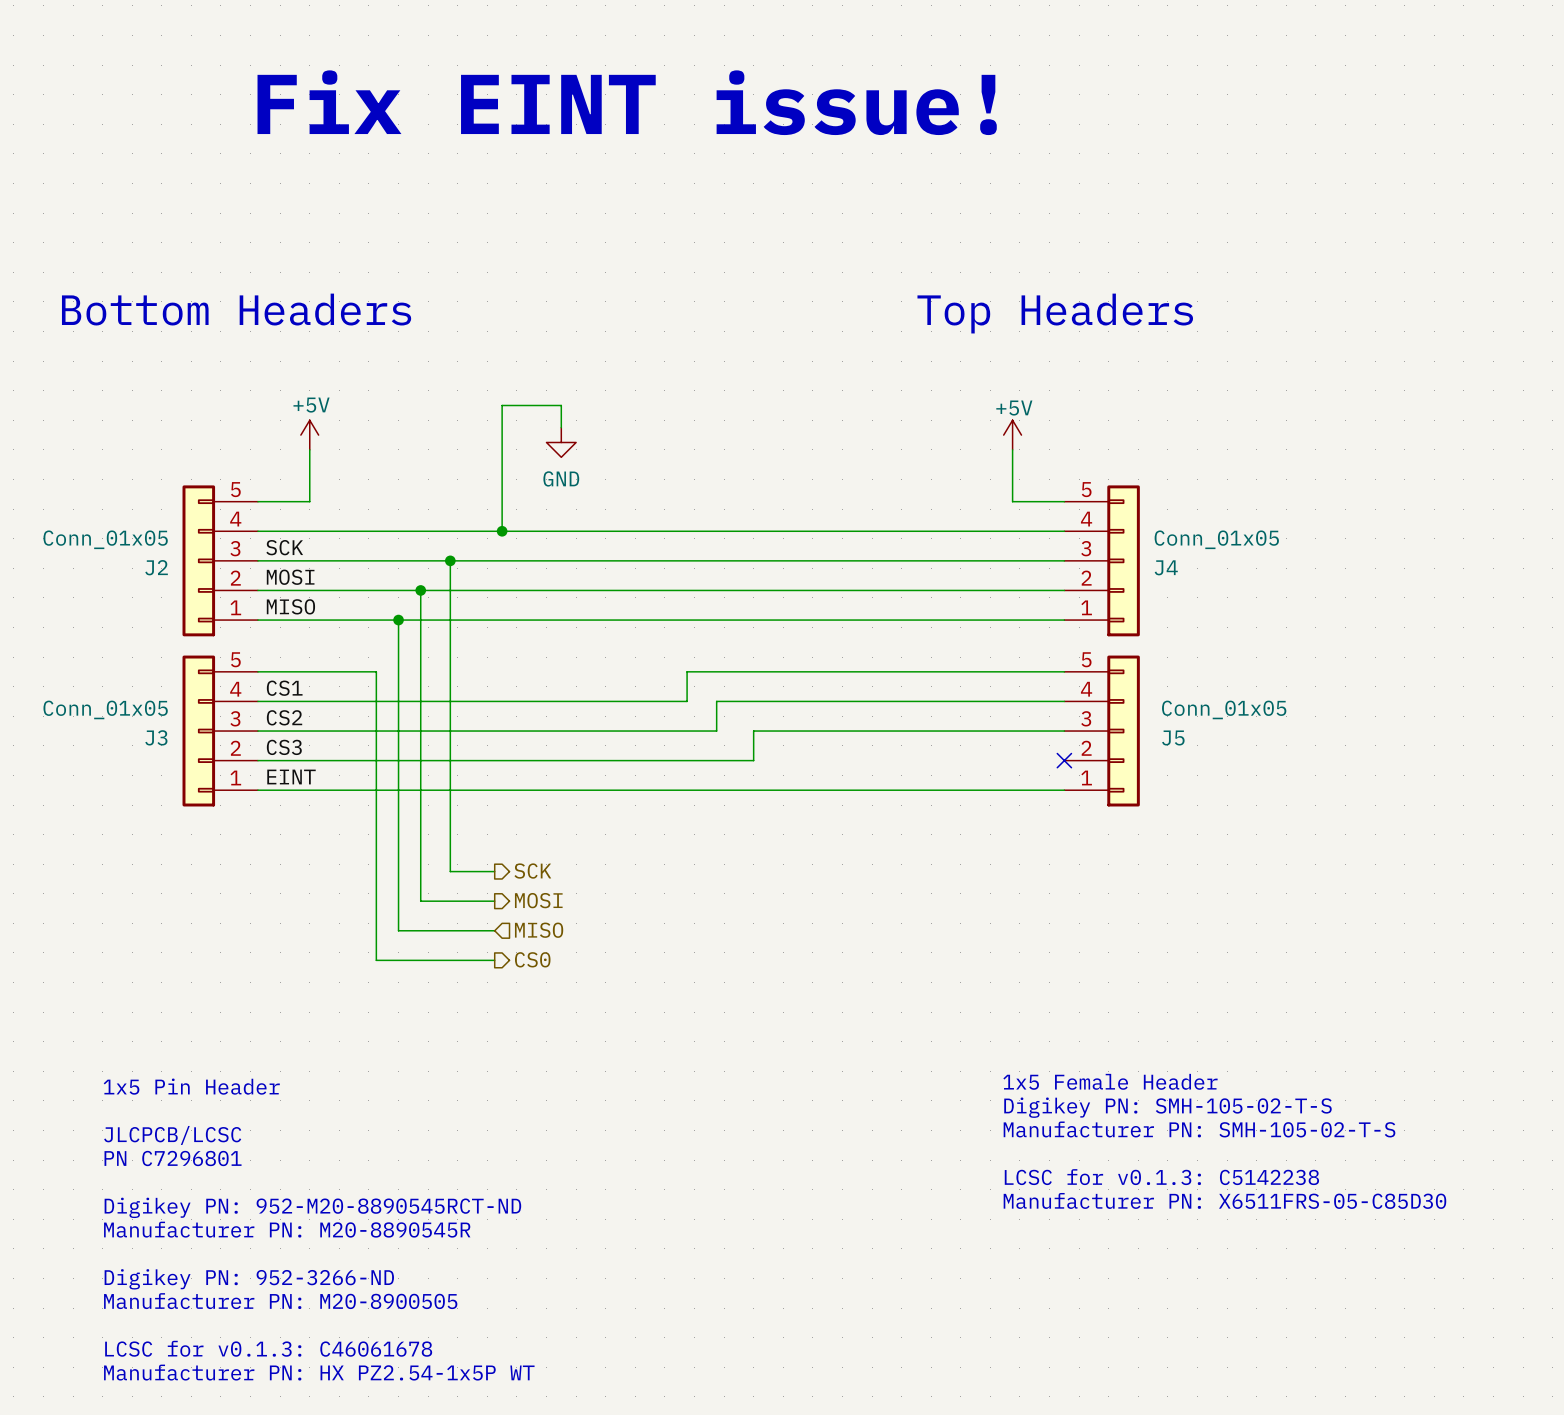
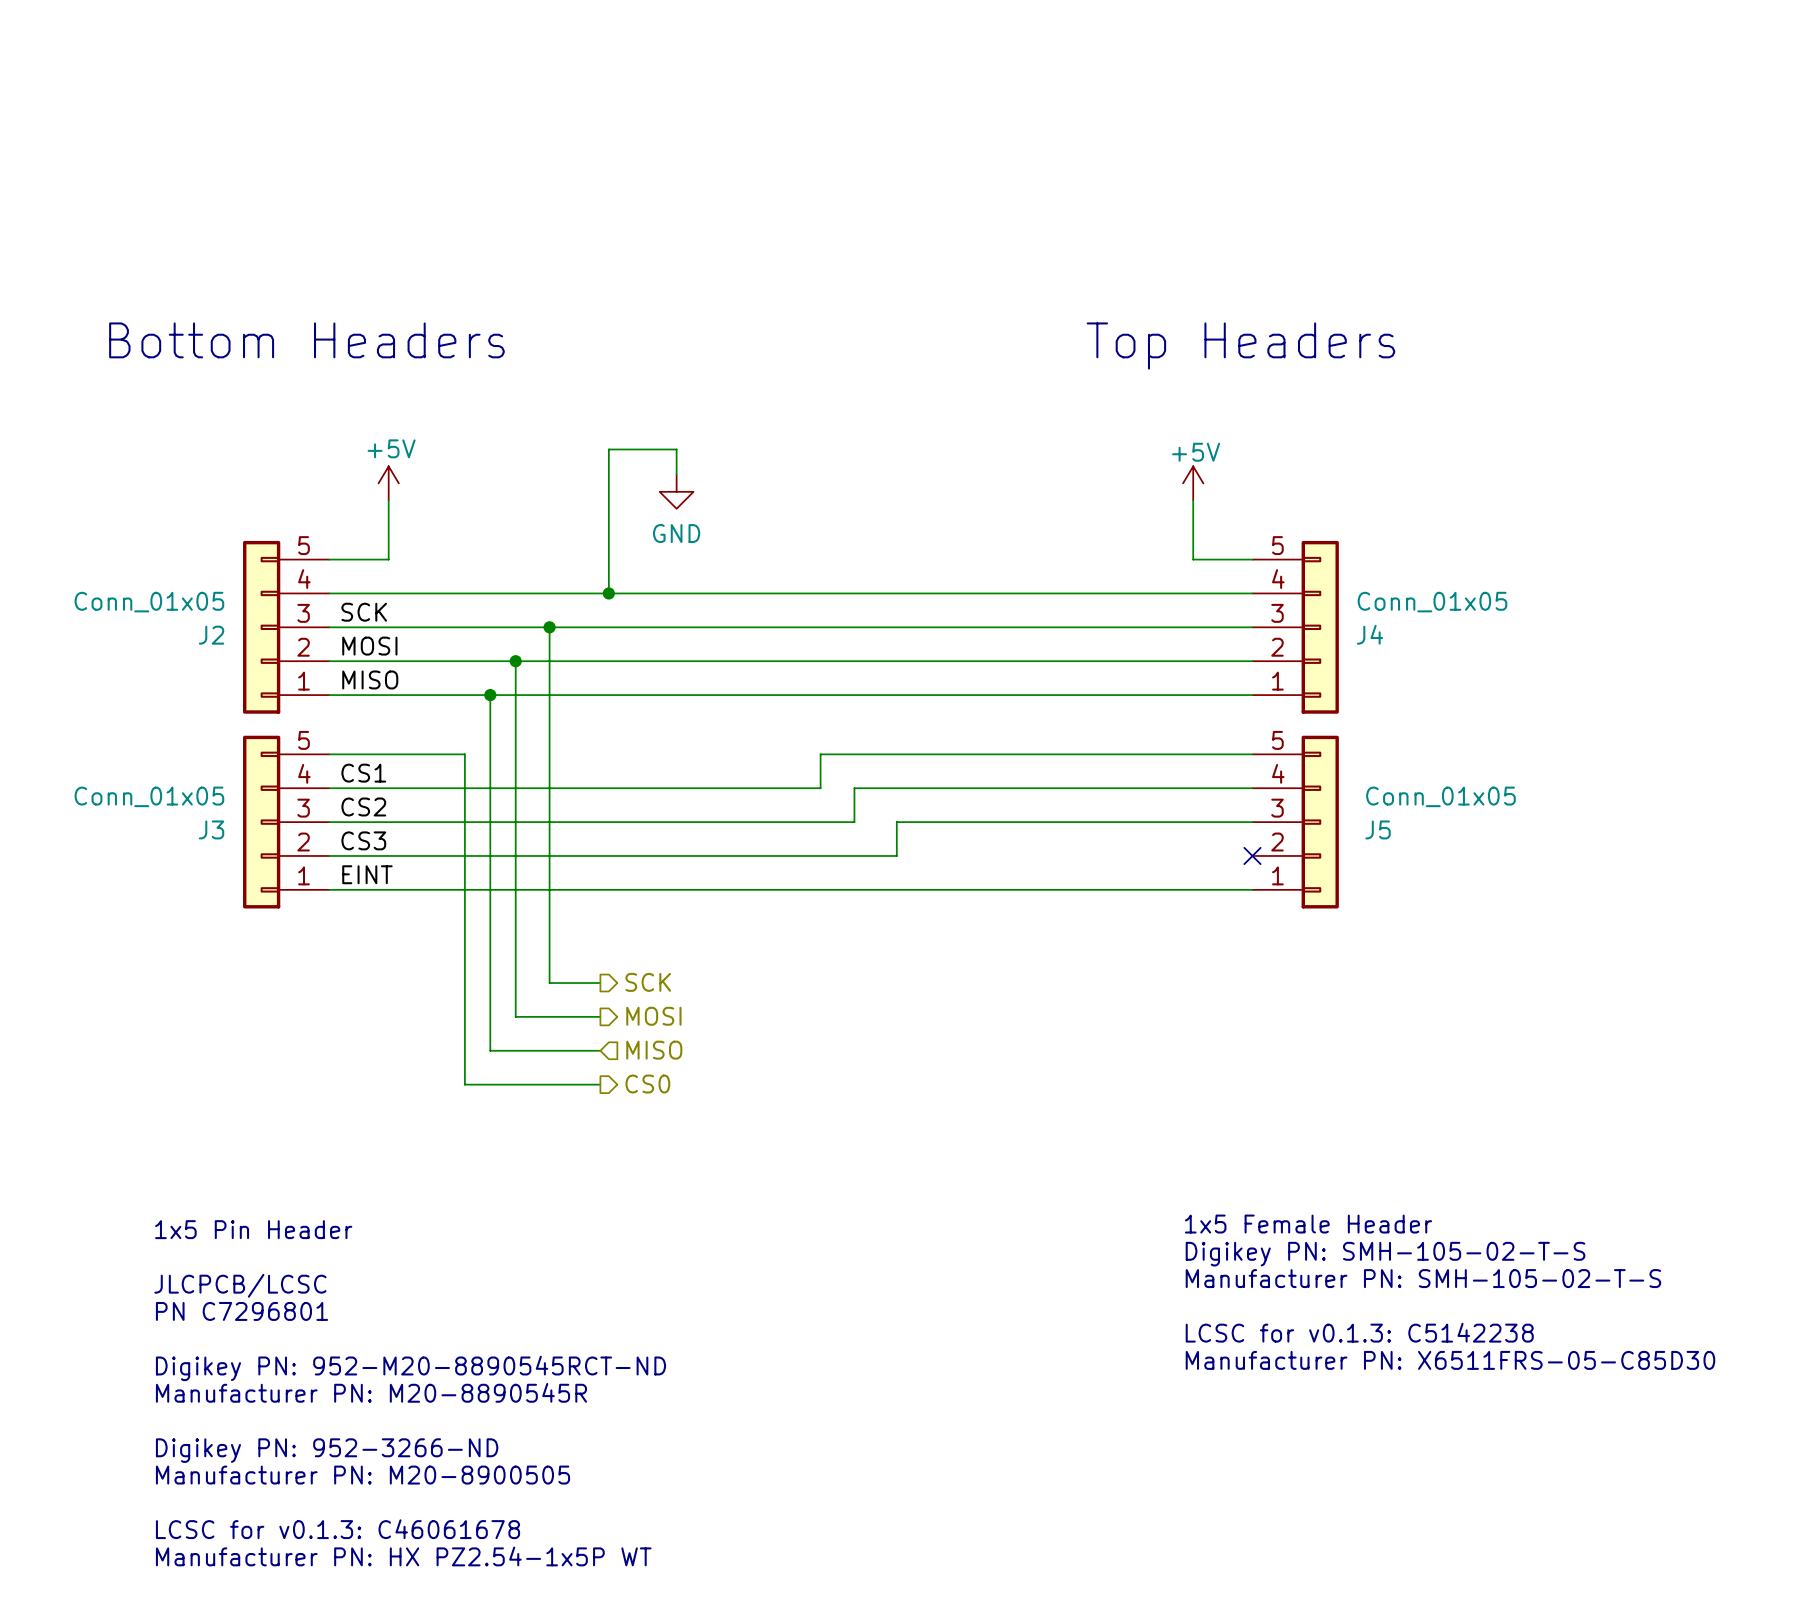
text: Fix EINT issue! (627, 102) -> none

